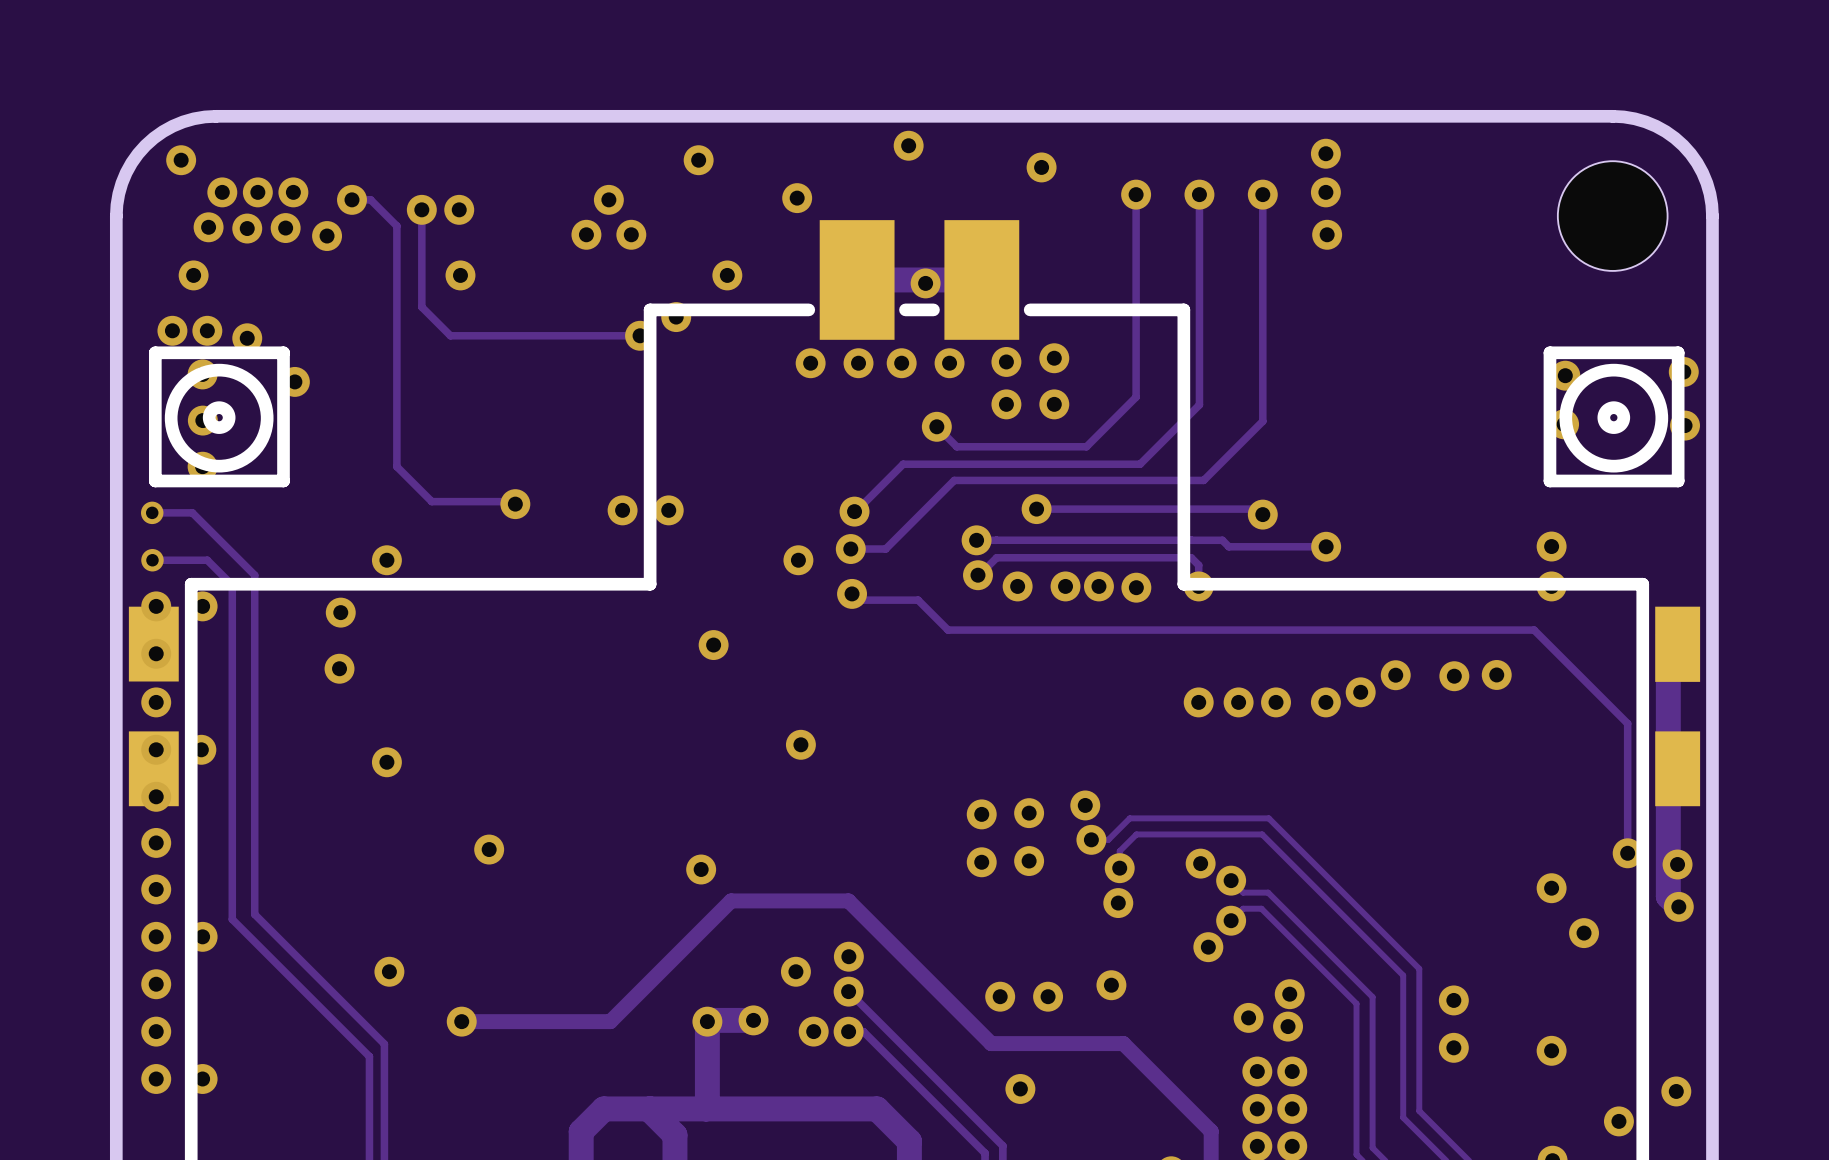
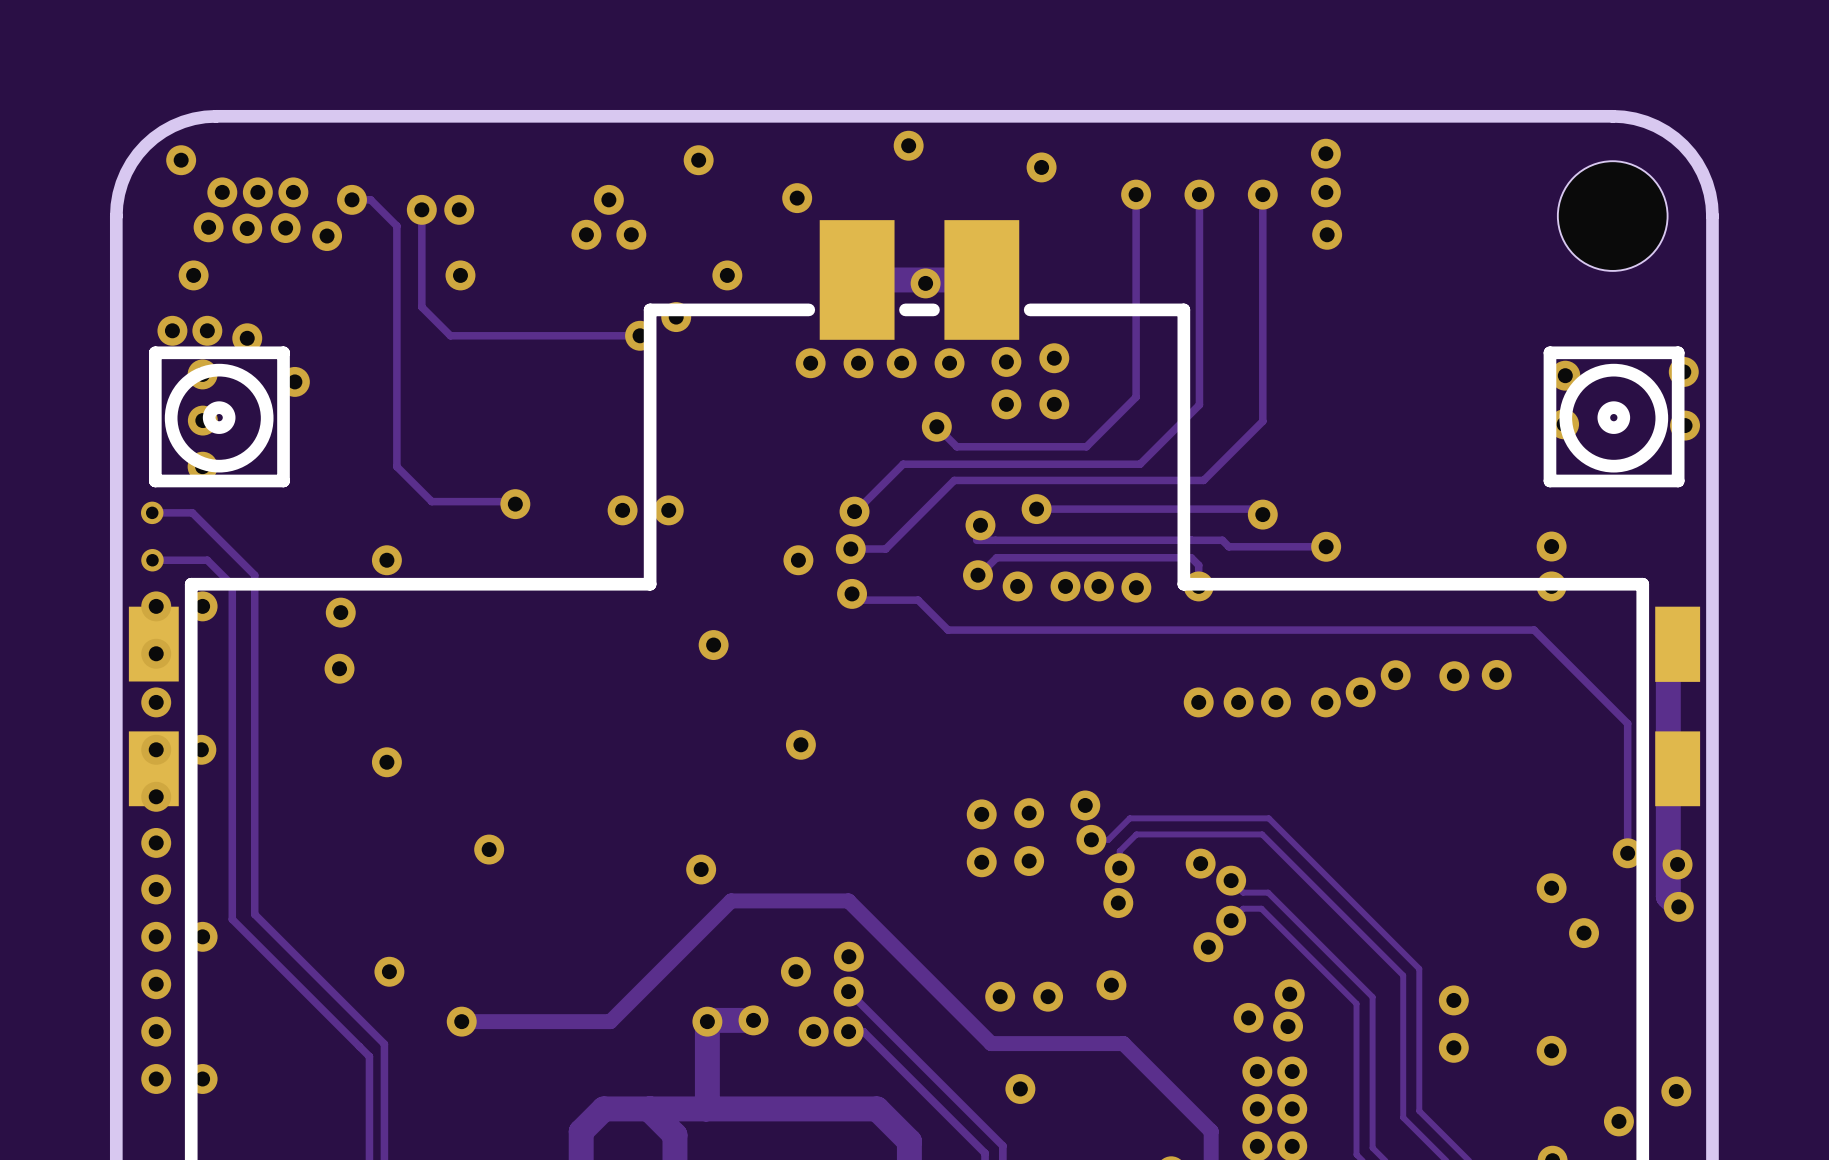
via position: (976, 540) -> (980, 525)

